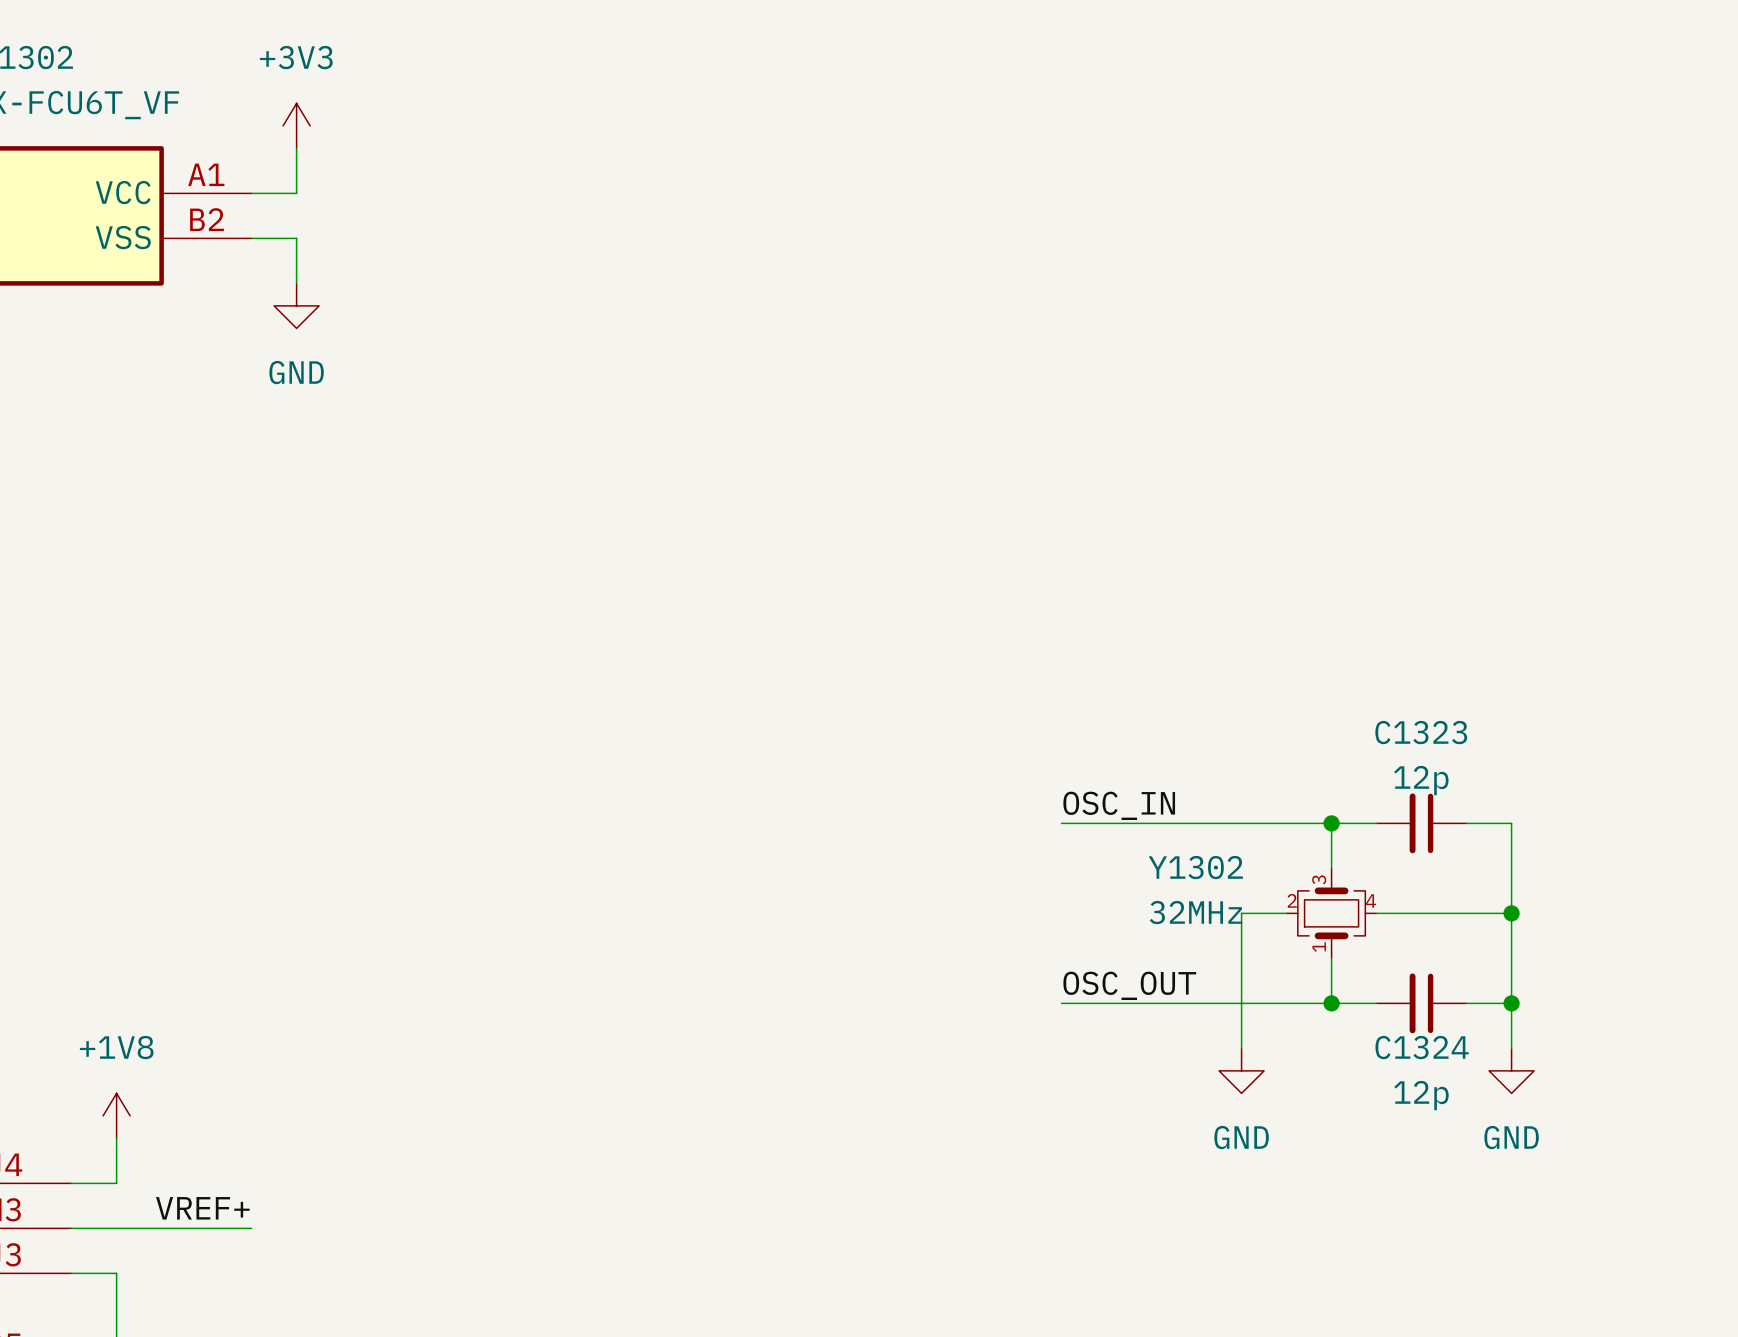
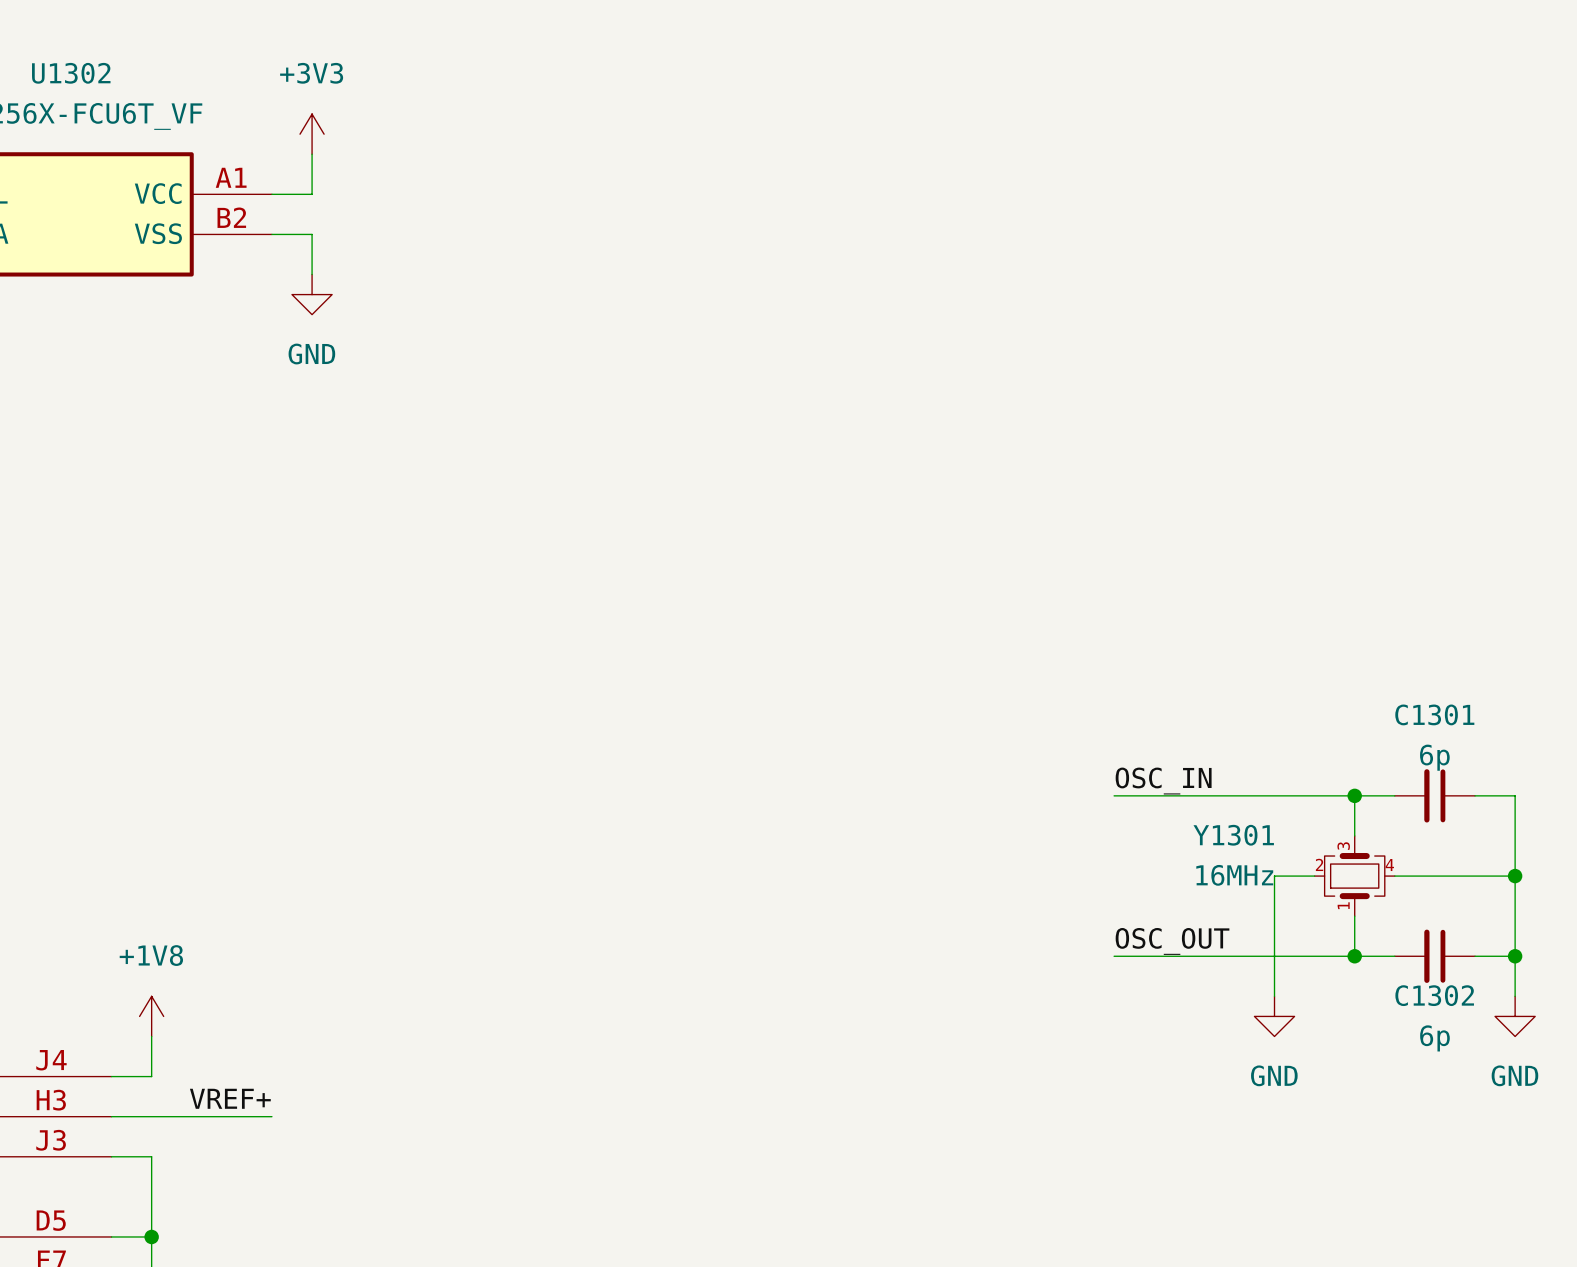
label position: OSC_IN (1119, 805) -> OSC_IN (1163, 781)
wire: (1061, 823) (1376, 823) -> (1114, 795) (1394, 795)
wire: (1331, 823) (1331, 868) -> (1354, 795) (1354, 835)
junction: (1331, 823) -> none
C1323: 12p (1421, 823) -> none
wire: (1466, 823) (1511, 823) (1511, 1048) -> (1114, 956) (1394, 956)
C1301: none -> 6p (1434, 795)
wire: none -> (1475, 795) (1515, 795) (1515, 996)
wire: (1286, 913) (1241, 913) (1241, 1048) -> (1314, 876) (1274, 876) (1274, 996)
Y1302: 32MHz (1331, 913) -> none
wire: (1376, 913) (1511, 913) -> (1394, 876) (1515, 876)
junction position: (1511, 913) -> (1354, 795)
wire: (1331, 958) (1331, 1003) -> none
Y1301: none -> 16MHz (1354, 876)
junction: none -> (1515, 876)
label position: OSC_OUT (1129, 985) -> OSC_OUT (1172, 941)
wire: (1061, 1003) (1376, 1003) -> none
junction: (1331, 1003) -> none
C1324: 12p (1421, 1003) -> none
wire: (1466, 1003) (1511, 1003) -> (1354, 916) (1354, 956)
junction position: (1511, 1003) -> (1354, 956)
C1302: none -> 6p (1434, 956)
wire: none -> (1475, 956) (1515, 956)
junction: none -> (1515, 956)
power symbol: GND (1241, 1070) -> none
power symbol: GND (1511, 1070) -> none
power symbol: none -> GND (1274, 1016)
power symbol: none -> GND (1515, 1016)

